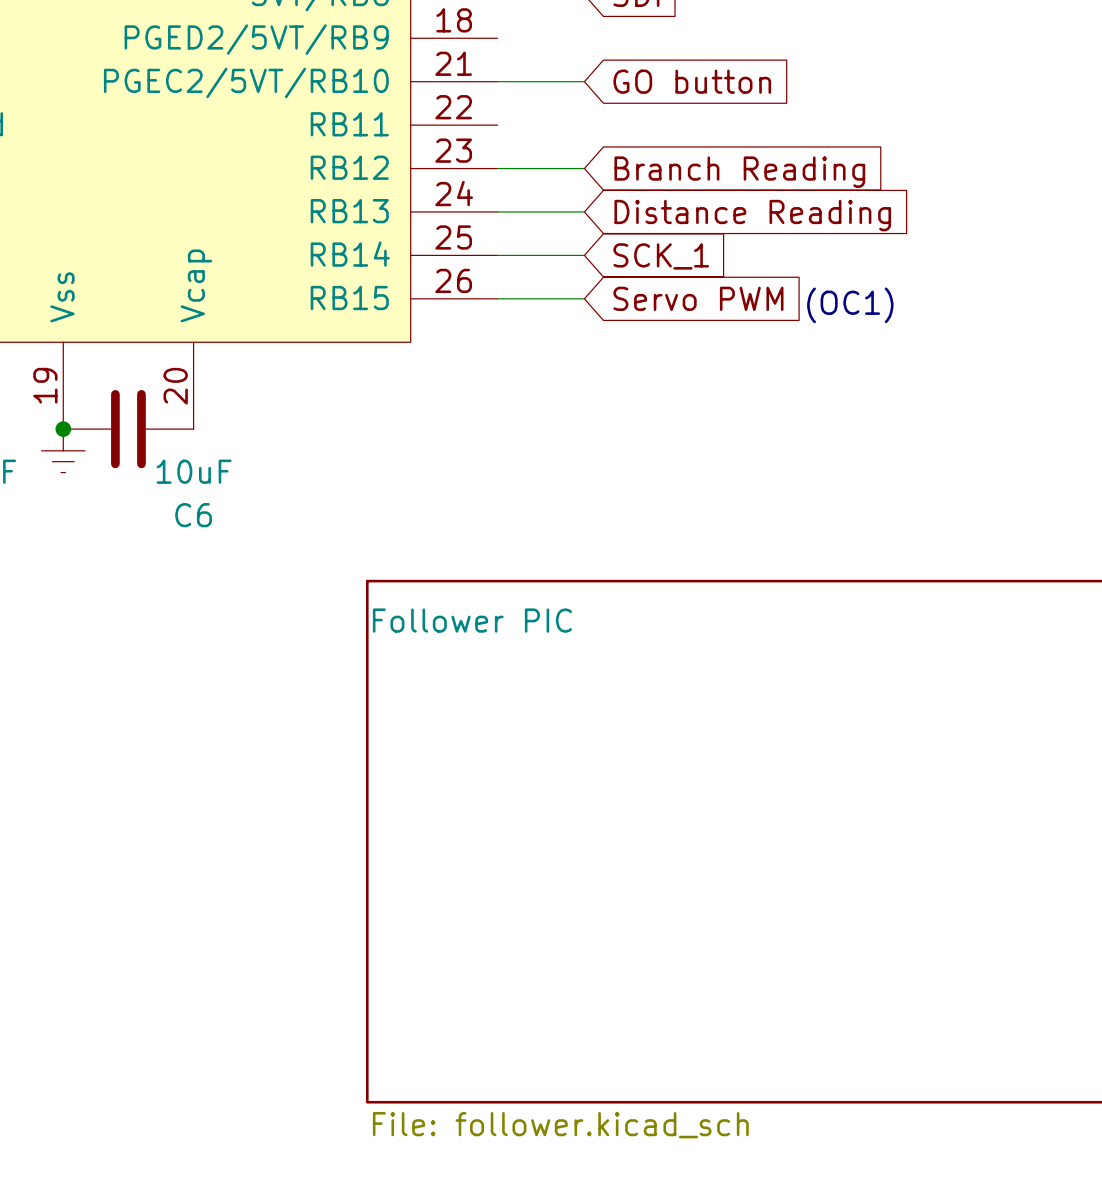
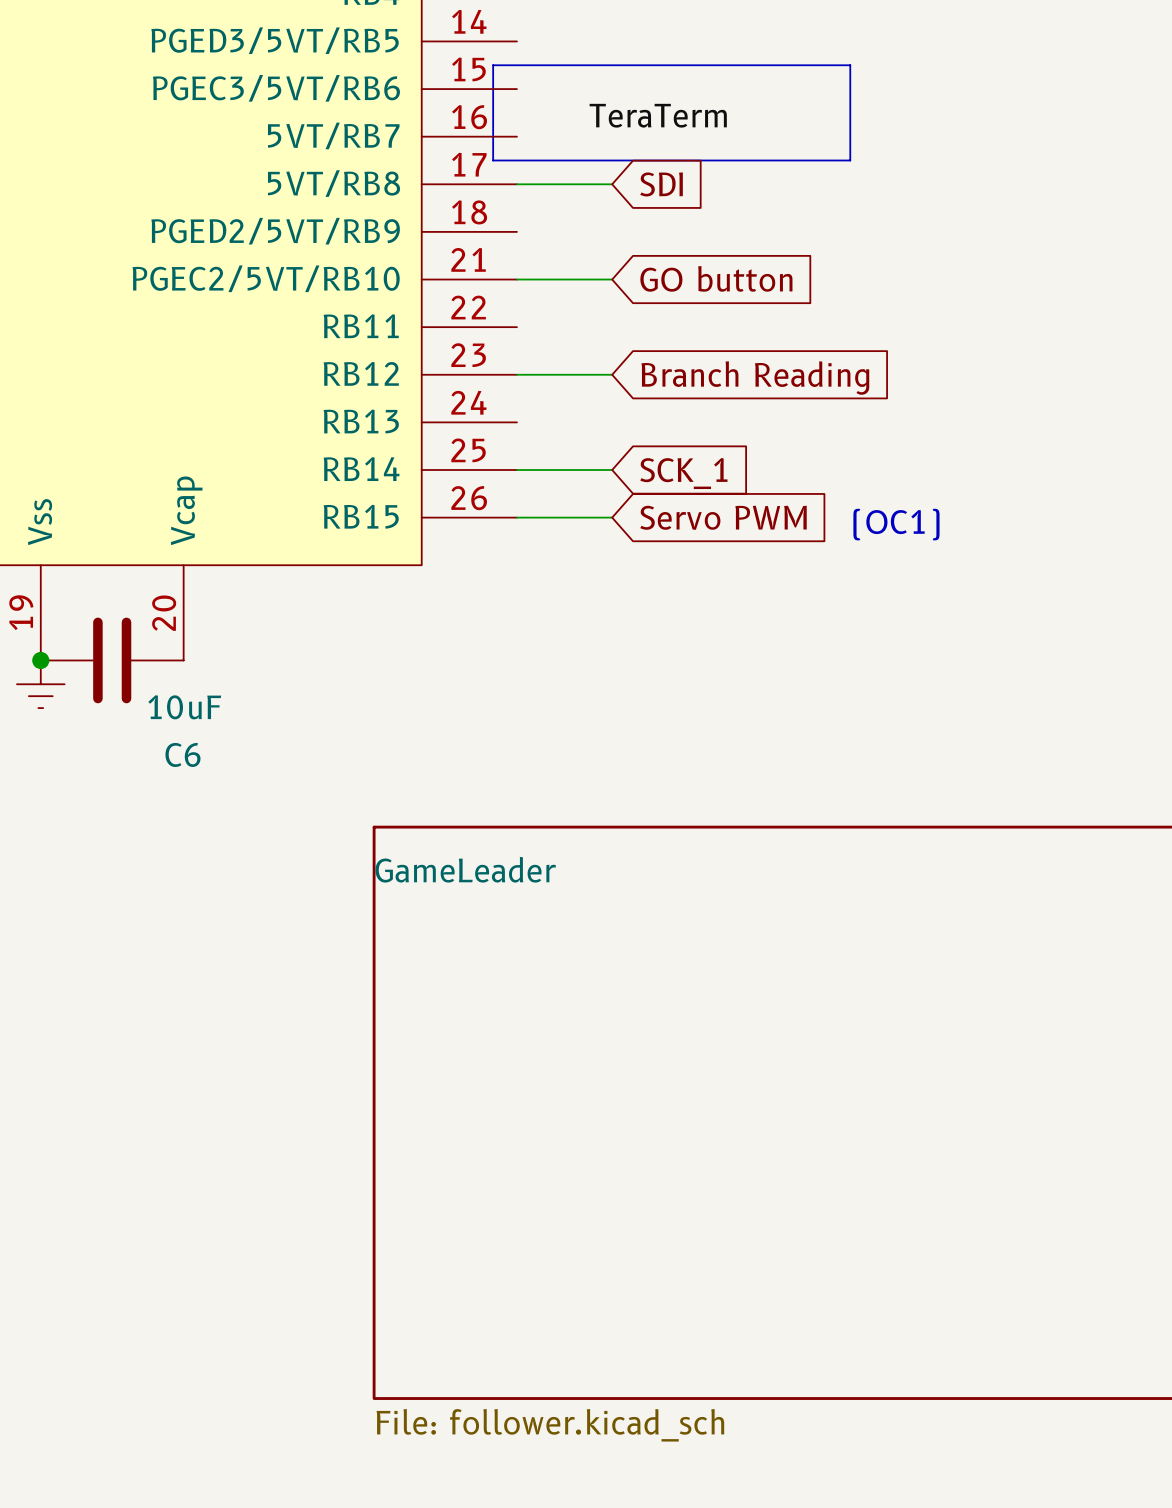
wire: (497, 211) (584, 211) -> none
global label: Distance Reading (752, 215) -> none
sheet Follower PIC name: Follower PIC (472, 620) -> GameLeader (465, 869)

